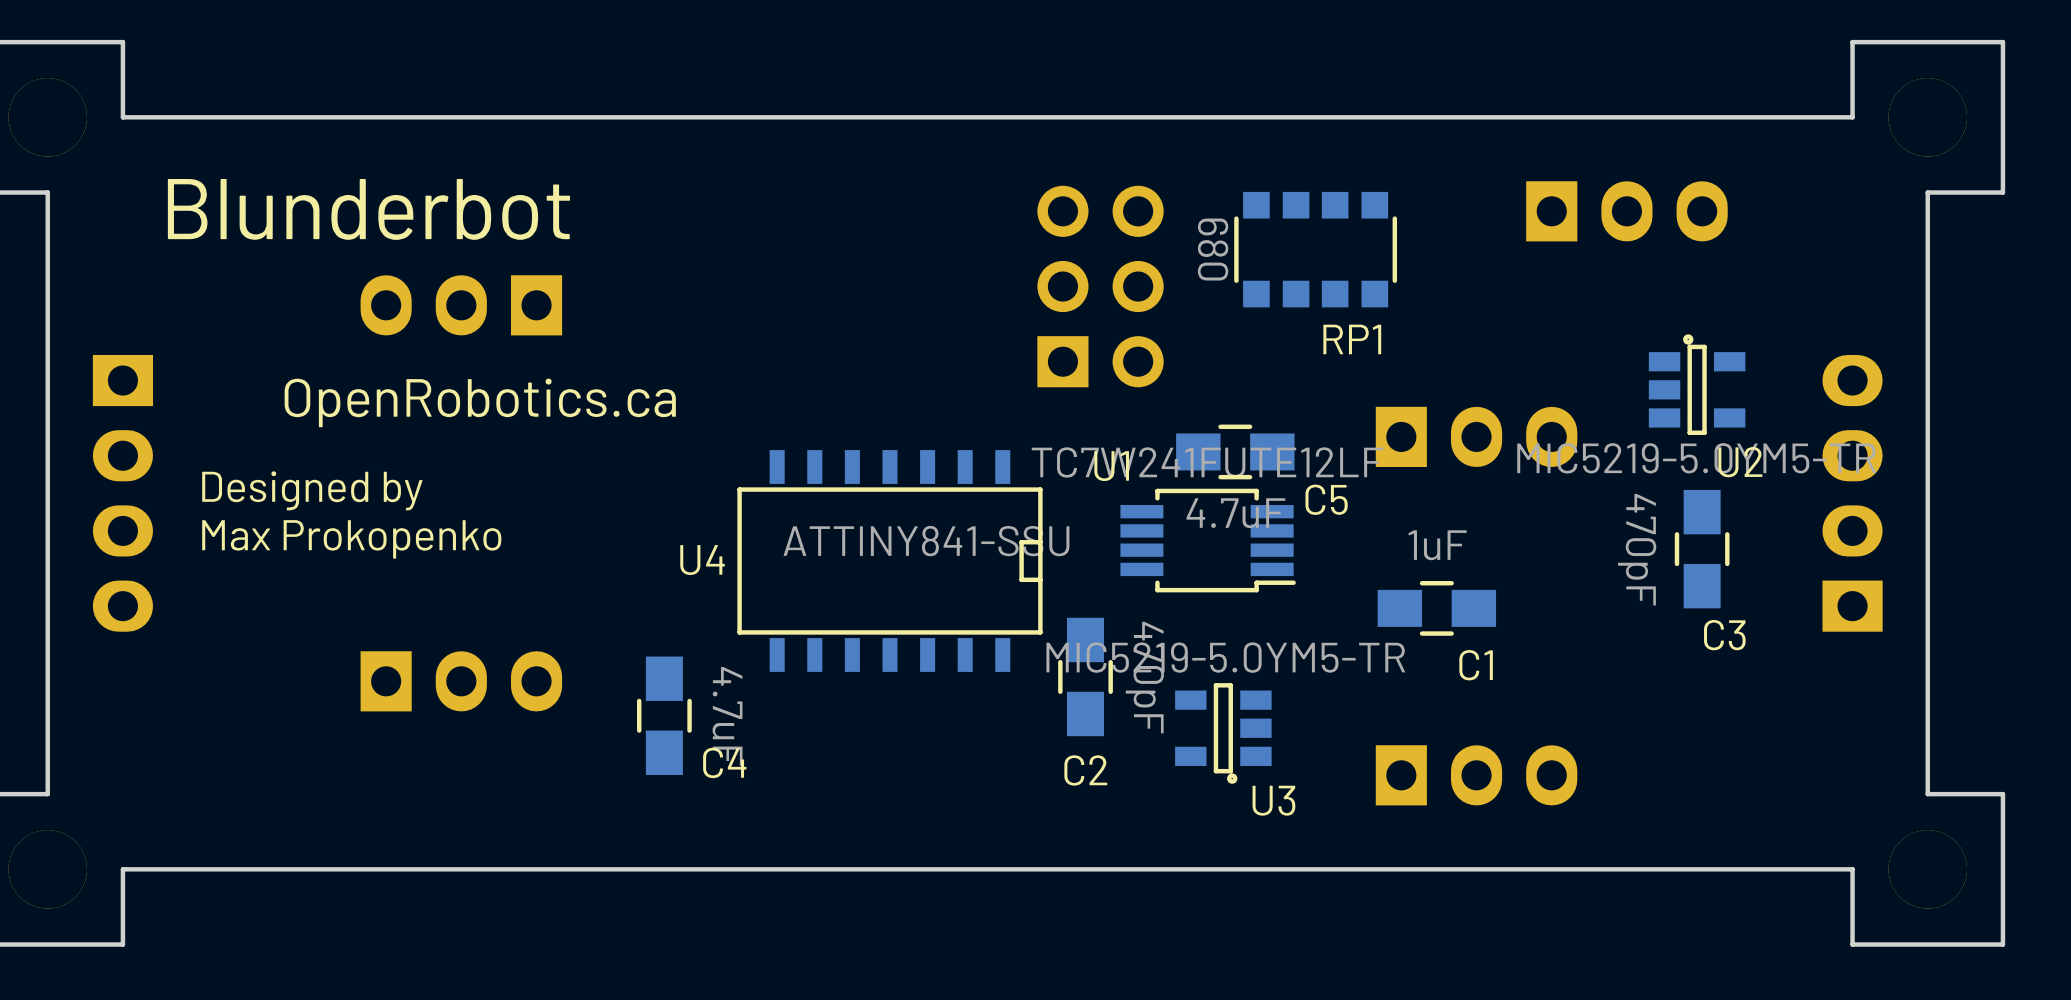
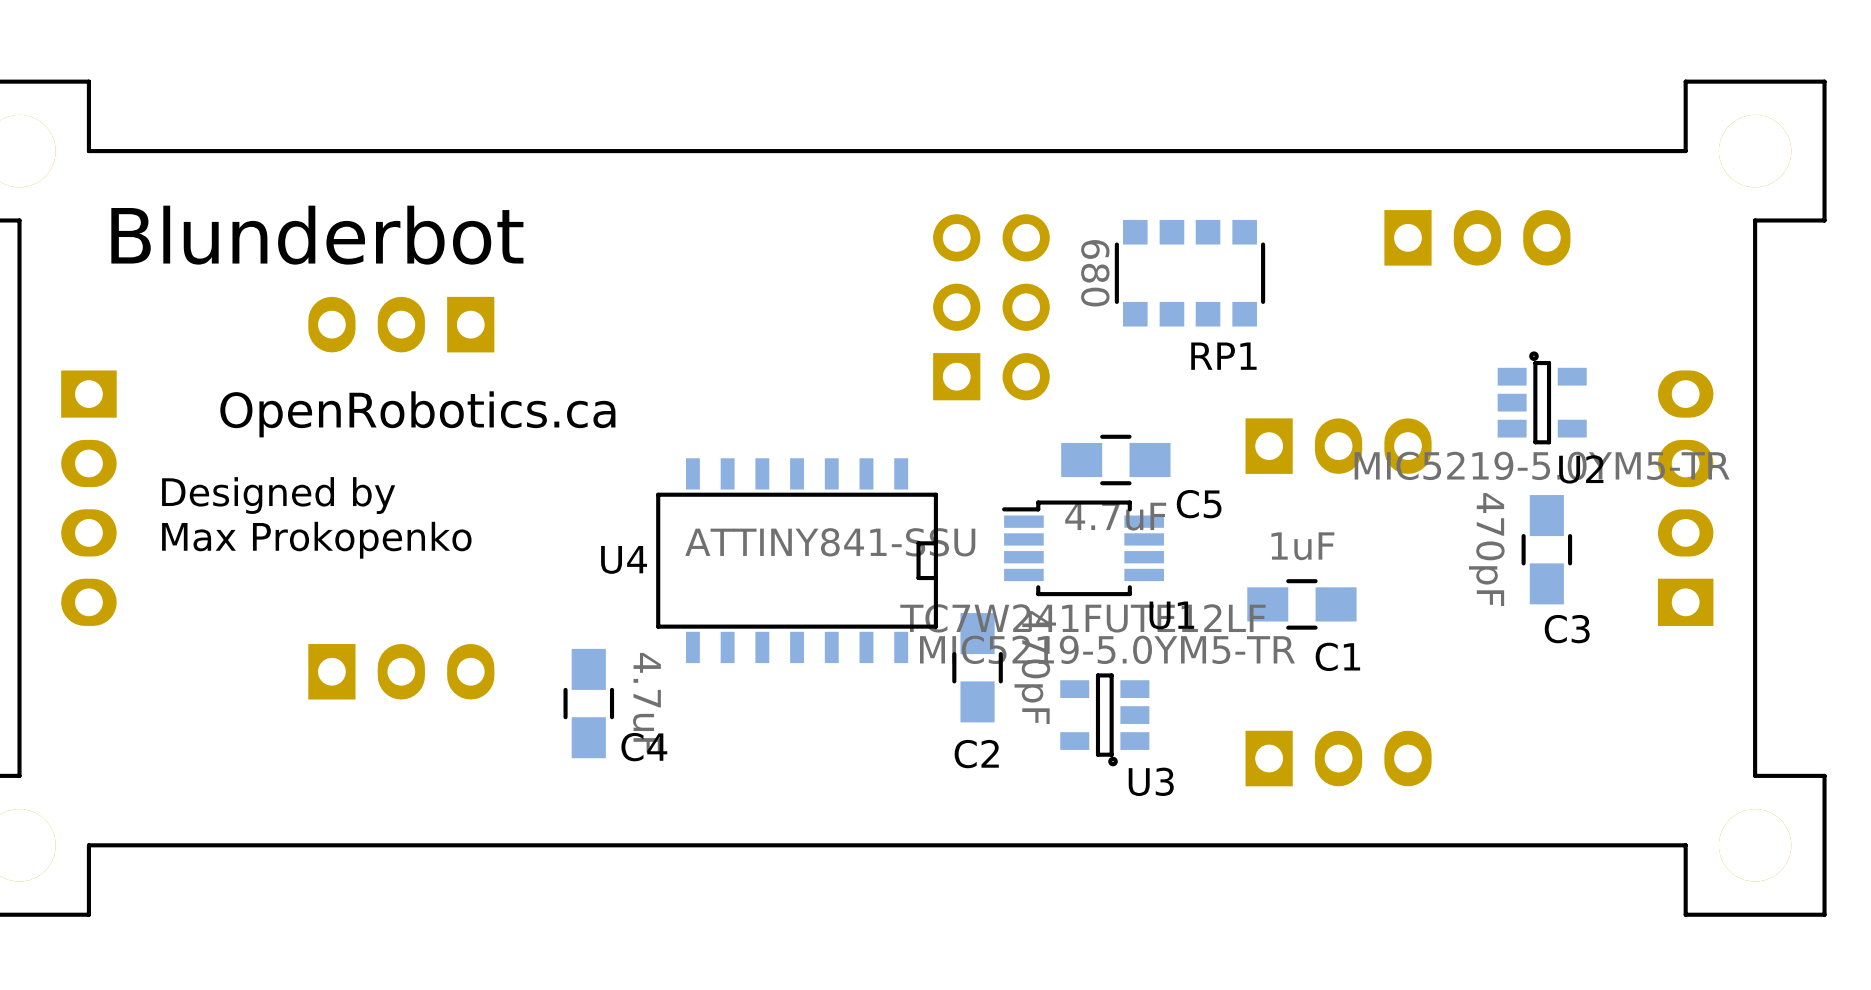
U1 rotation: 0° (1208, 540) -> 180° (1083, 548)

